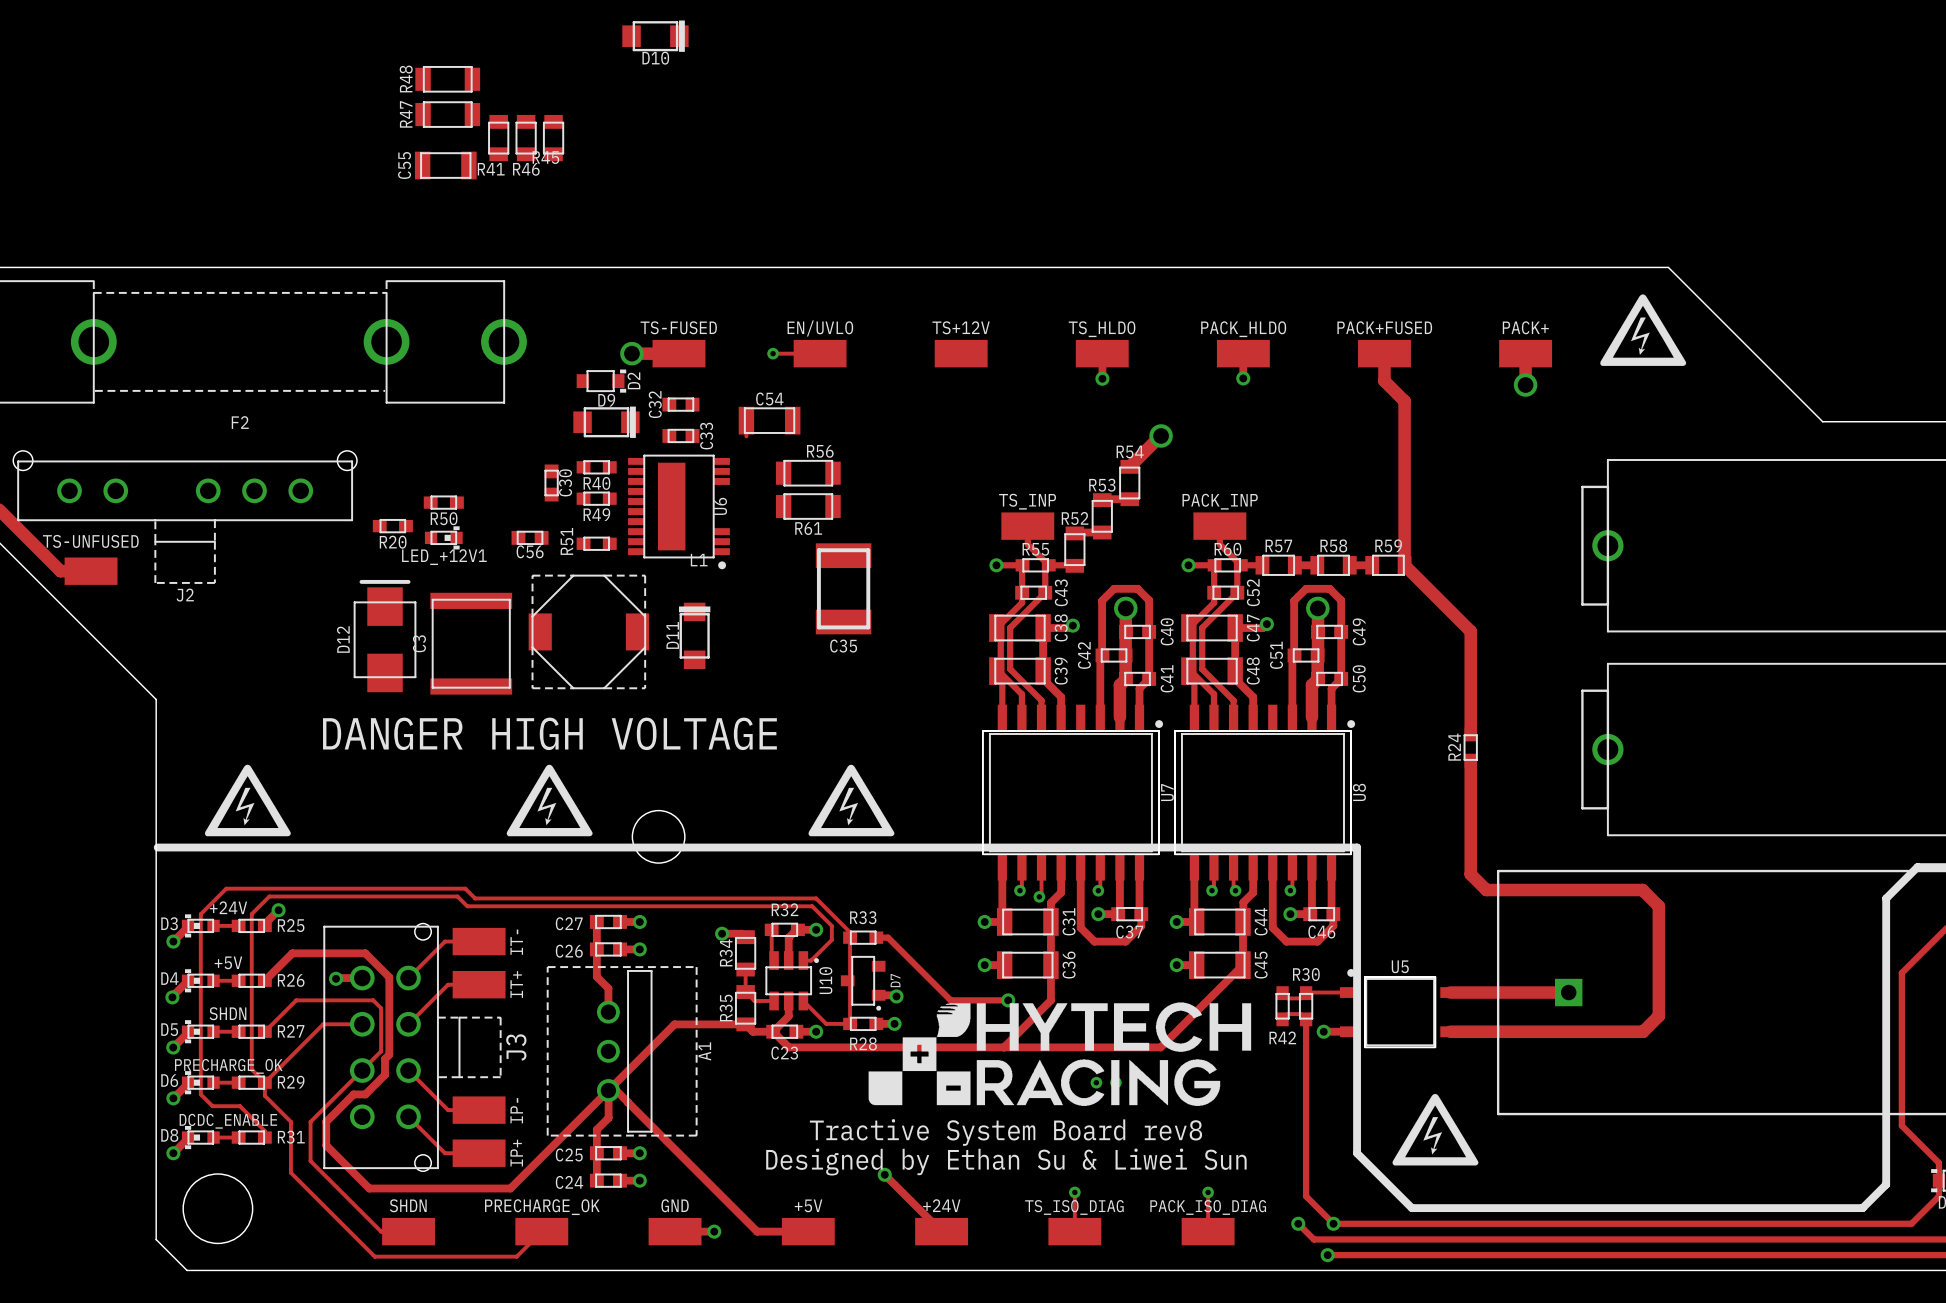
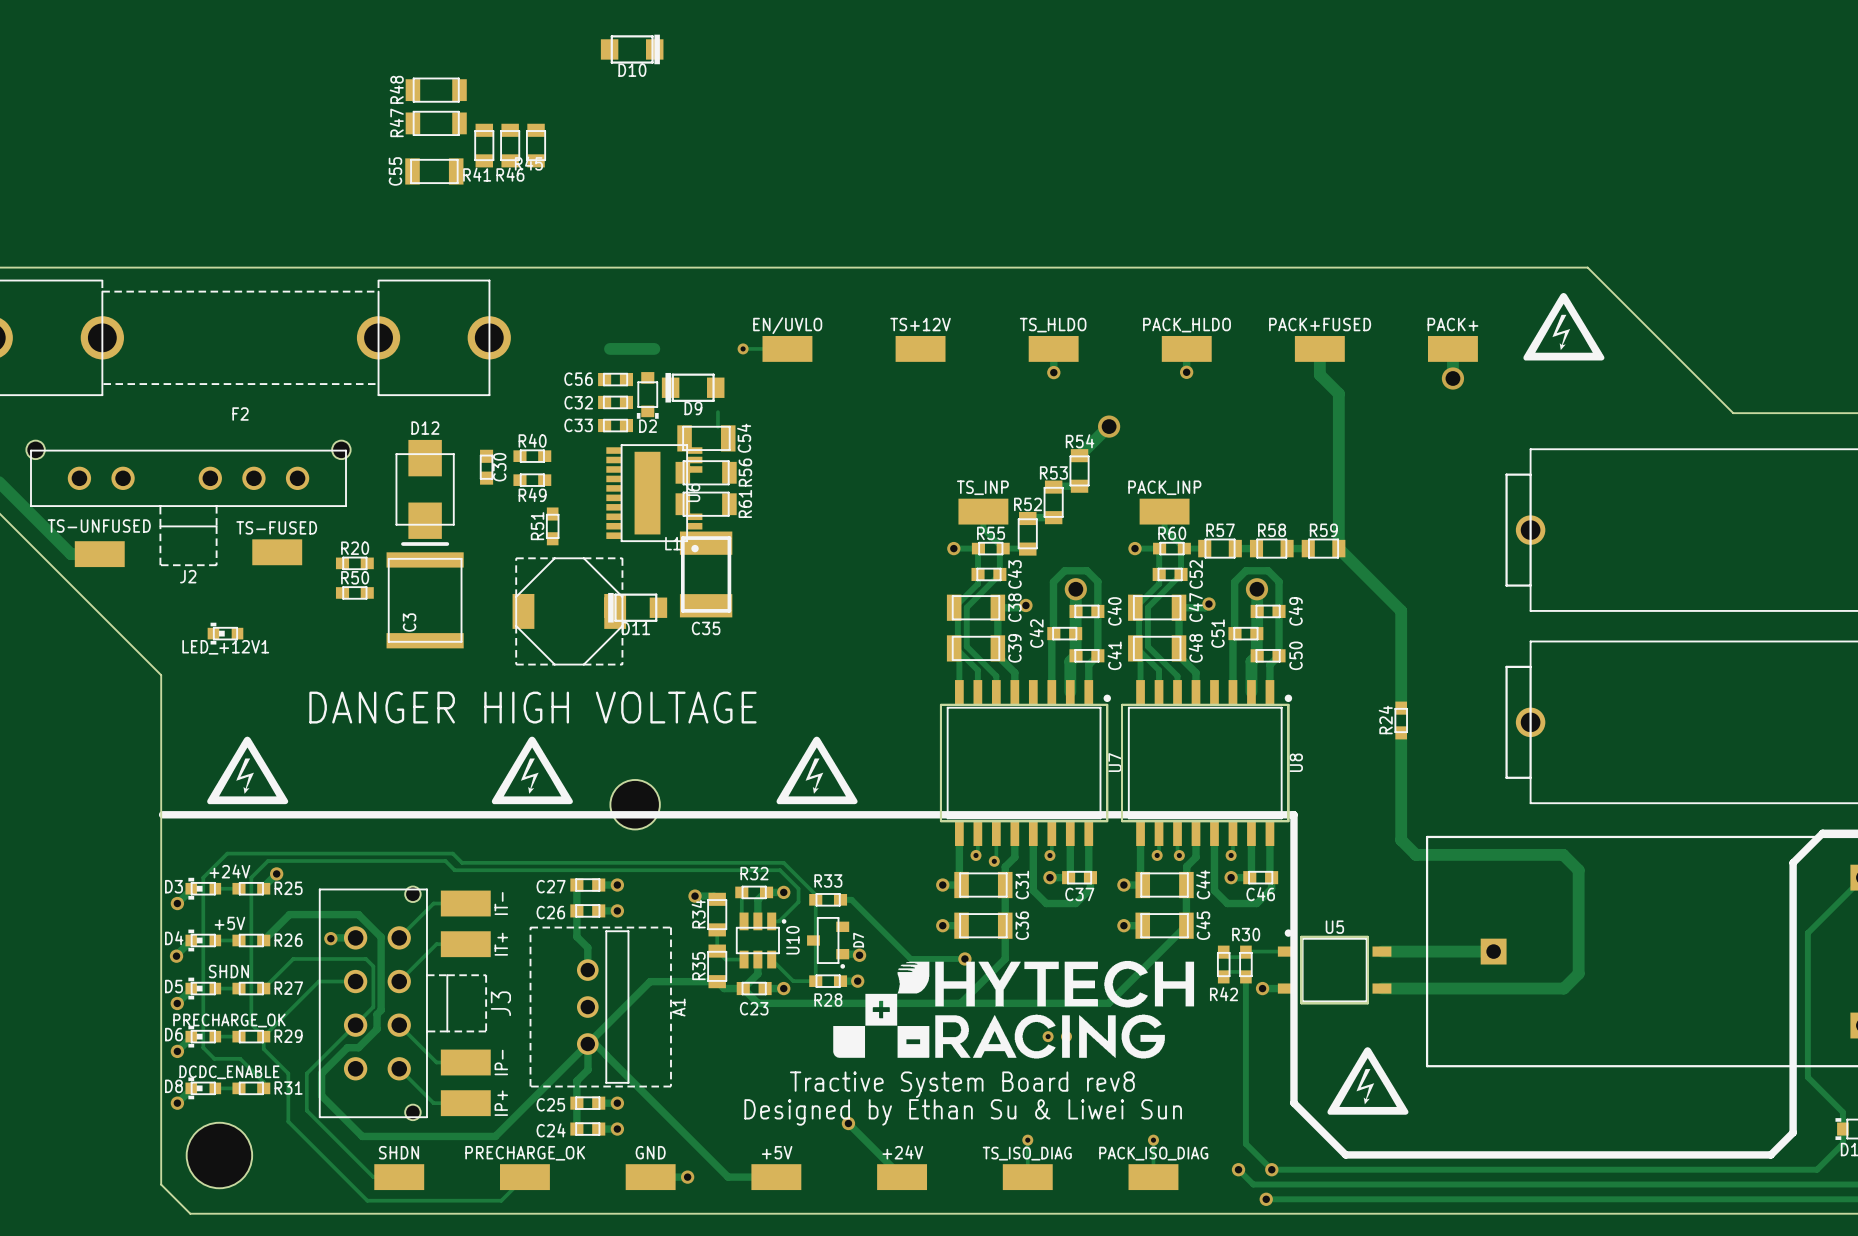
via: (631, 353) -> none
TS-FUSED: (678, 353) -> none
D2 rotation: 0° (601, 381) -> 90° clockwise (647, 395)
D2 position: (601, 381) -> (647, 395)
C54 name rotation: 0° (769, 399) -> 90° counterclockwise (744, 438)
C54 name position: C54 (769, 399) -> C54 (744, 438)
C32 name rotation: 0° (655, 404) -> 90° clockwise (578, 402)
C32 position: (680, 404) -> (615, 402)
C54 position: (769, 420) -> (706, 438)
D9 rotation: 0° (606, 422) -> 180° (693, 387)
D9 position: (606, 422) -> (693, 387)
C33 position: (680, 435) -> (615, 425)
C33 name rotation: 0° (706, 436) -> 90° clockwise (578, 425)
C33 name position: C33 (706, 436) -> C33 (578, 425)
R56 name rotation: 0° (820, 451) -> 90° counterclockwise (745, 472)
R40 position: (596, 467) -> (532, 456)
R56 position: (808, 473) -> (706, 472)
C30 position: (551, 483) -> (486, 467)
R40 name position: R40 (596, 483) -> R40 (532, 440)
R49 position: (596, 498) -> (532, 480)
R50 position: (443, 502) -> (354, 592)
R61 position: (808, 506) -> (706, 504)
R50 name position: R50 (444, 518) -> R50 (355, 577)
R20 position: (392, 526) -> (354, 563)
R61 name rotation: 0° (808, 528) -> 90° counterclockwise (745, 503)
LED_+12V1 rotation: 0° (443, 537) -> 180° (225, 633)
LED_+12V1 position: (443, 537) -> (225, 633)
C56 position: (530, 537) -> (615, 379)
R20 name position: R20 (393, 542) -> R20 (355, 548)
R51 rotation: 0° (596, 543) -> 90° clockwise (552, 526)
R51 position: (596, 543) -> (552, 526)
C56 name position: C56 (530, 551) -> C56 (578, 379)
TS-FUSED: none -> (277, 552)
C35 position: (843, 588) -> (706, 574)
D11 rotation: 0° (694, 635) -> 90° counterclockwise (635, 607)
D12 rotation: 0° (385, 636) -> 180° (425, 492)
D12 position: (385, 636) -> (425, 492)
D12 name position: D12 (343, 639) -> D12 (425, 428)
C3 position: (471, 643) -> (425, 600)

